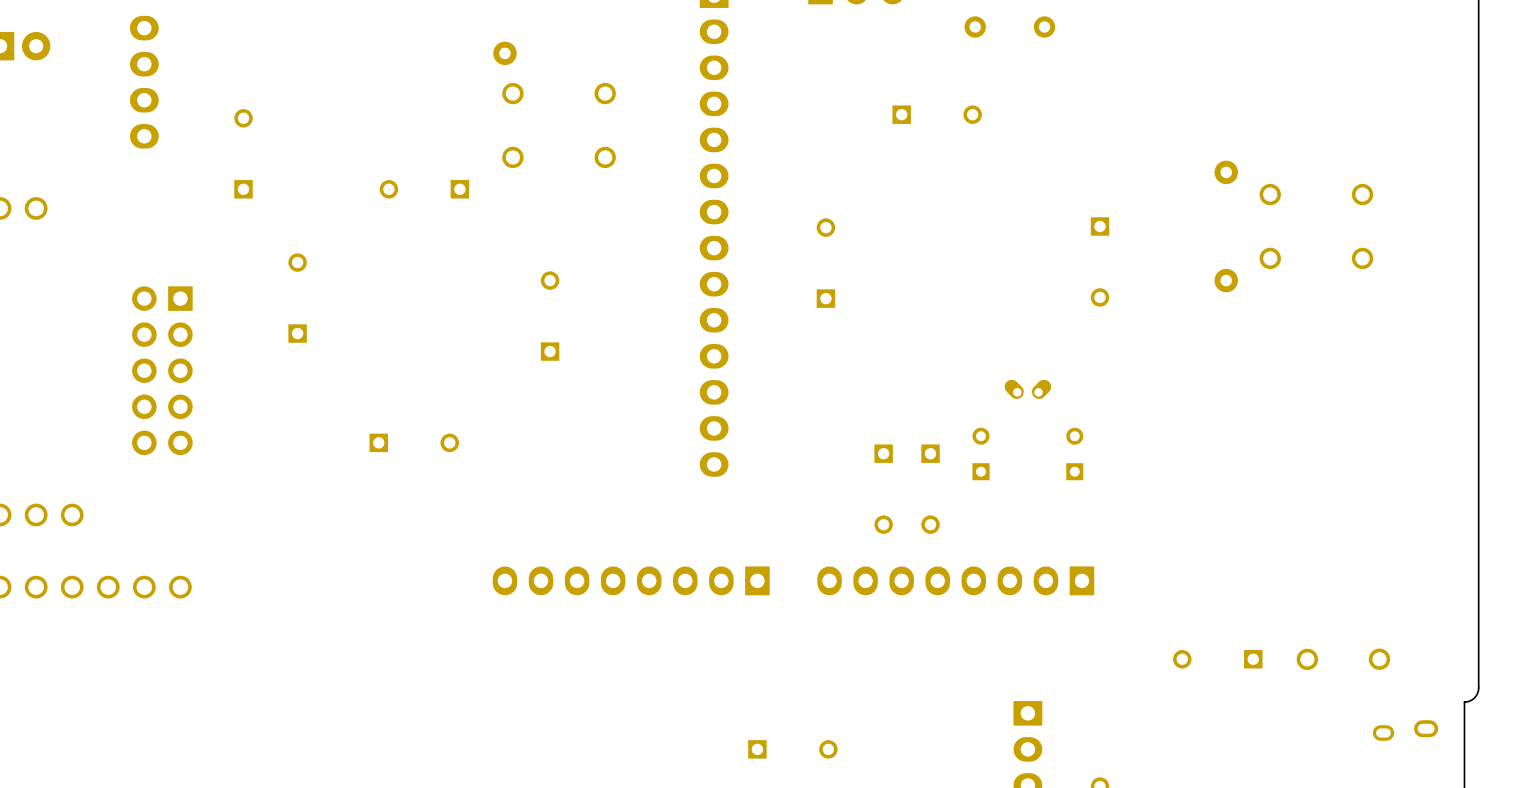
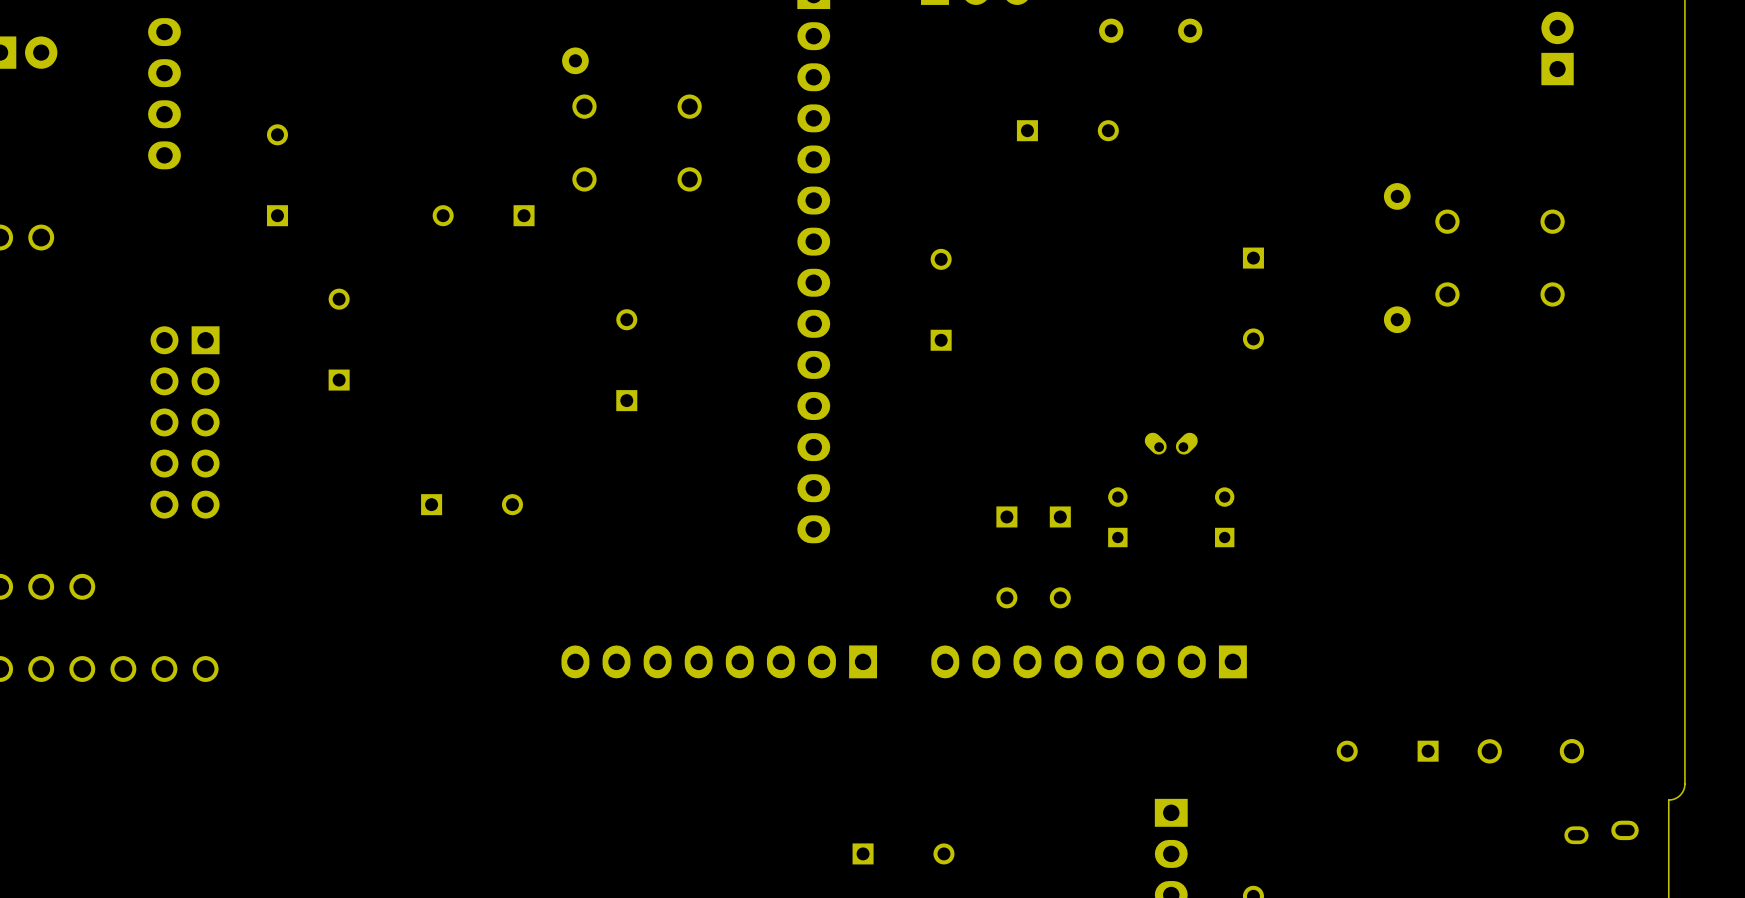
part: none -> (1557, 48)

